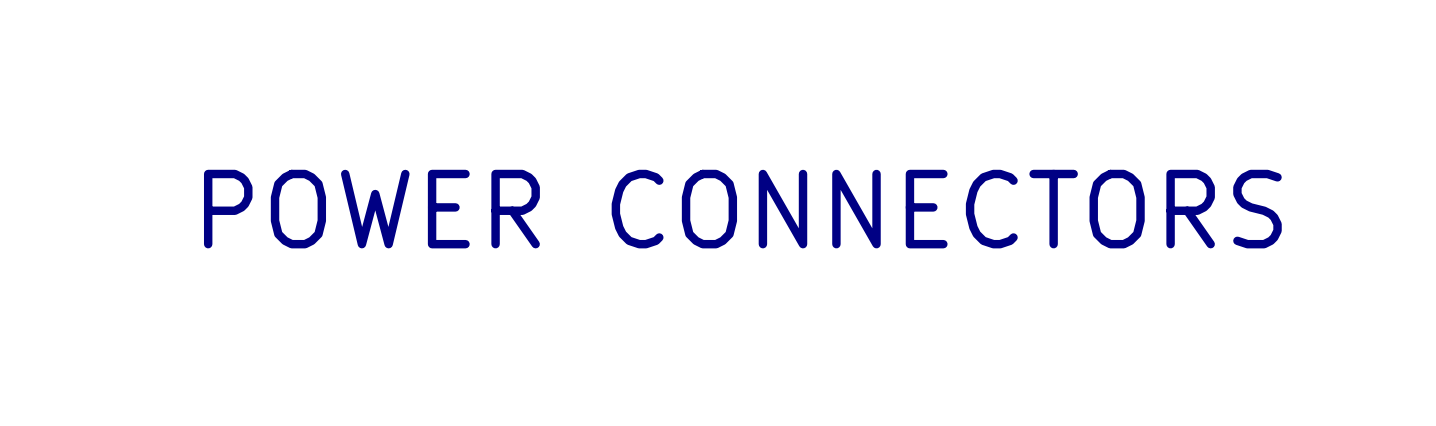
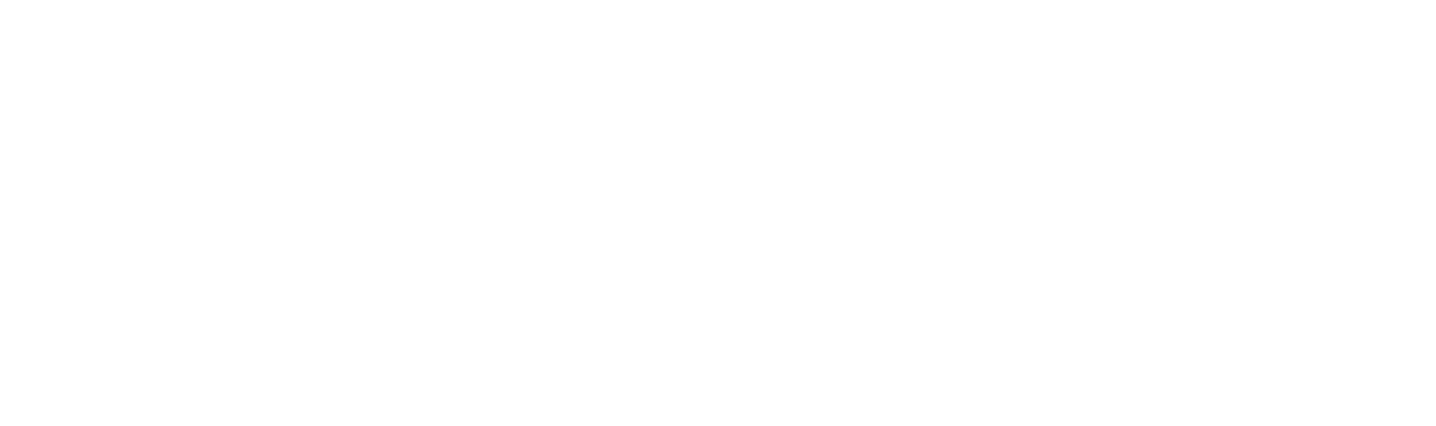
text: POWER CONNECTORS (742, 209) -> none

